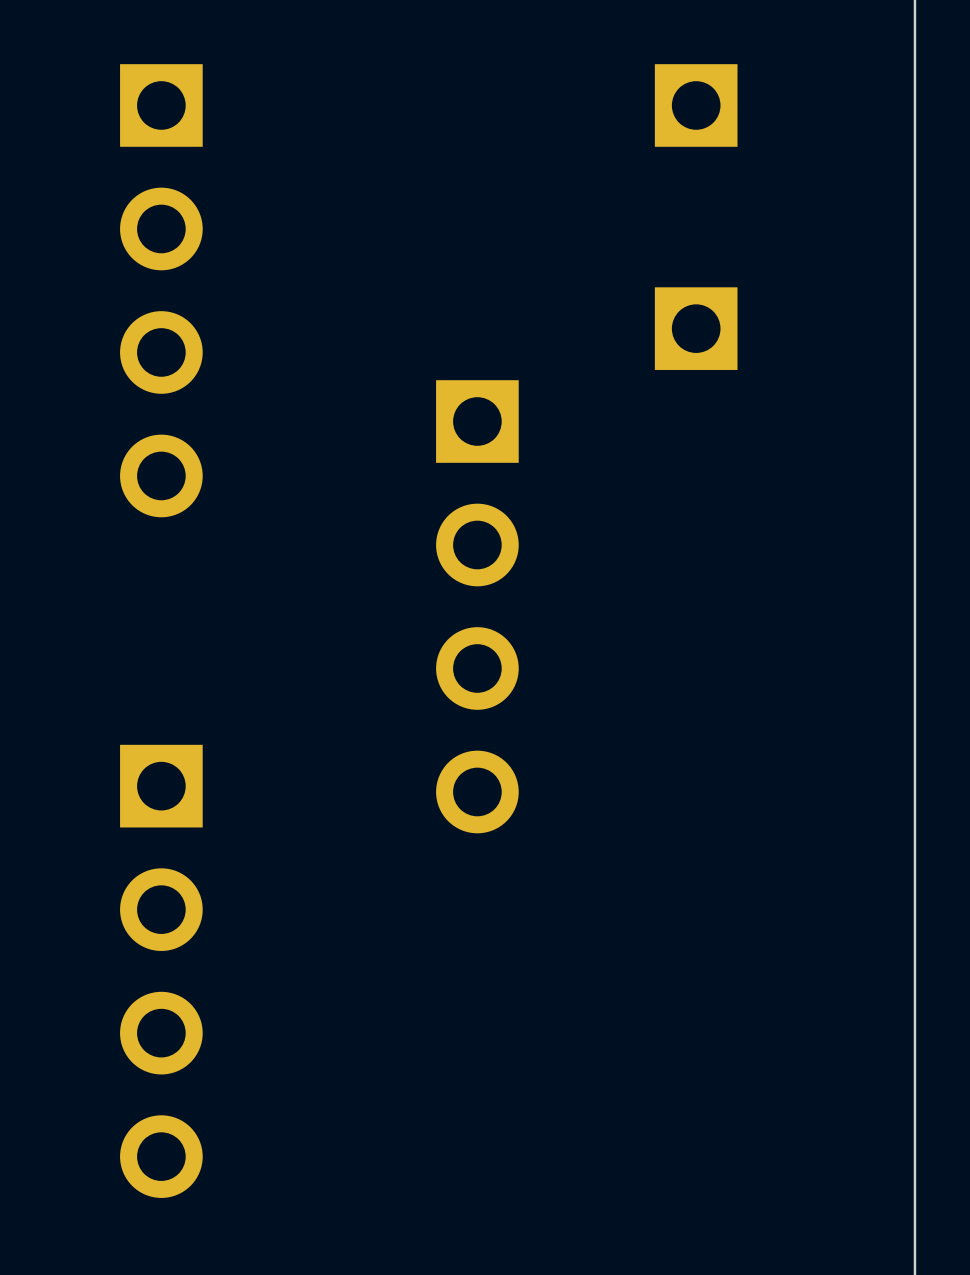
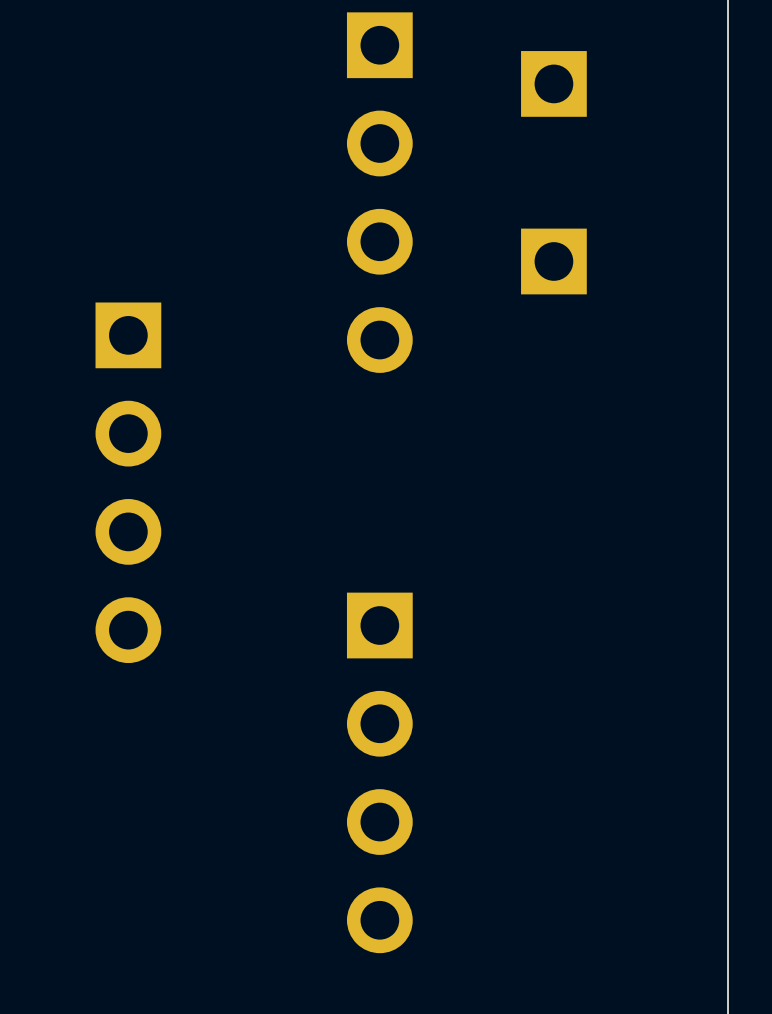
part: none -> (379, 192)
part: (161, 290) -> none
part: none -> (128, 482)
part: (477, 606) -> none
part: (161, 971) -> none
part: none -> (379, 772)

